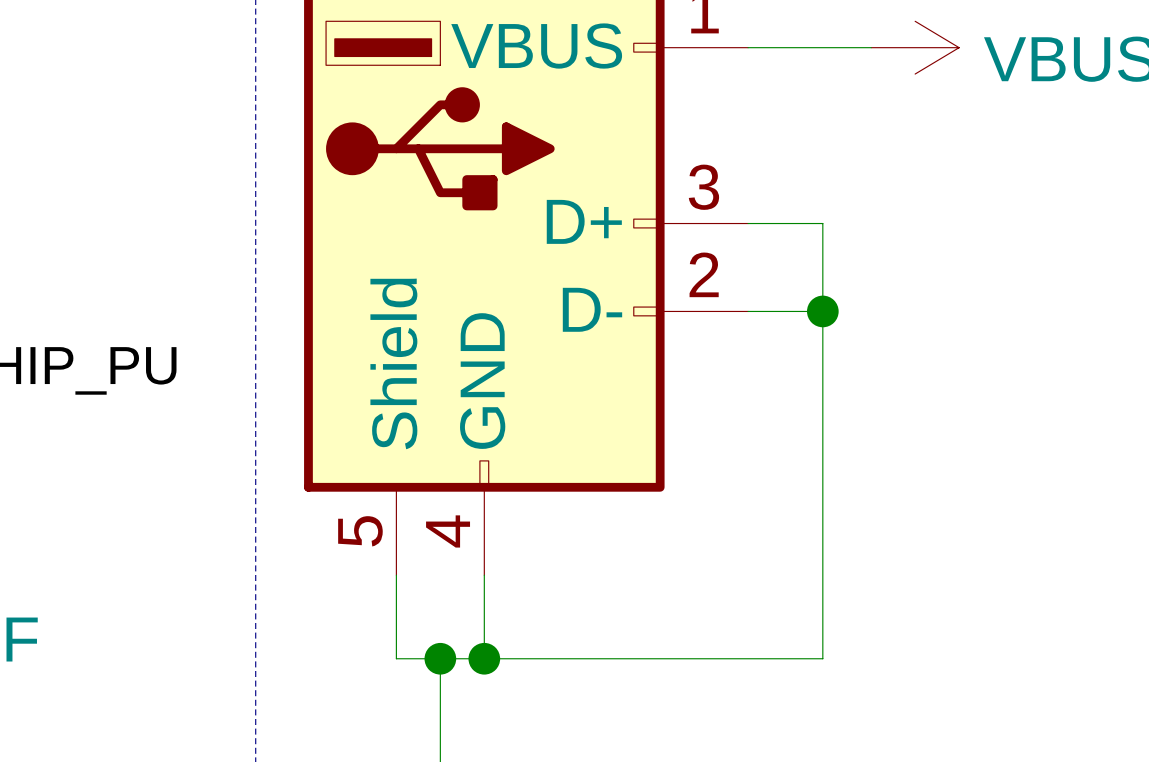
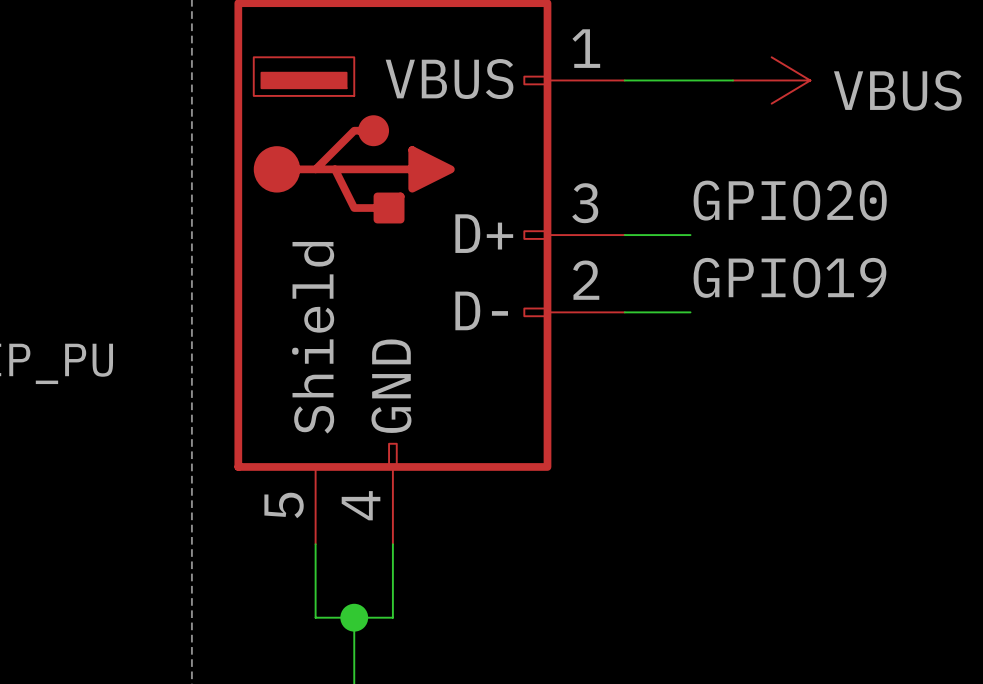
label: none -> GPIO20 (790, 200)
wire: (822, 223) (822, 658) (484, 658) -> none
label: none -> GPIO19 (789, 277)
junction: (822, 311) -> none
junction: (484, 658) -> none

